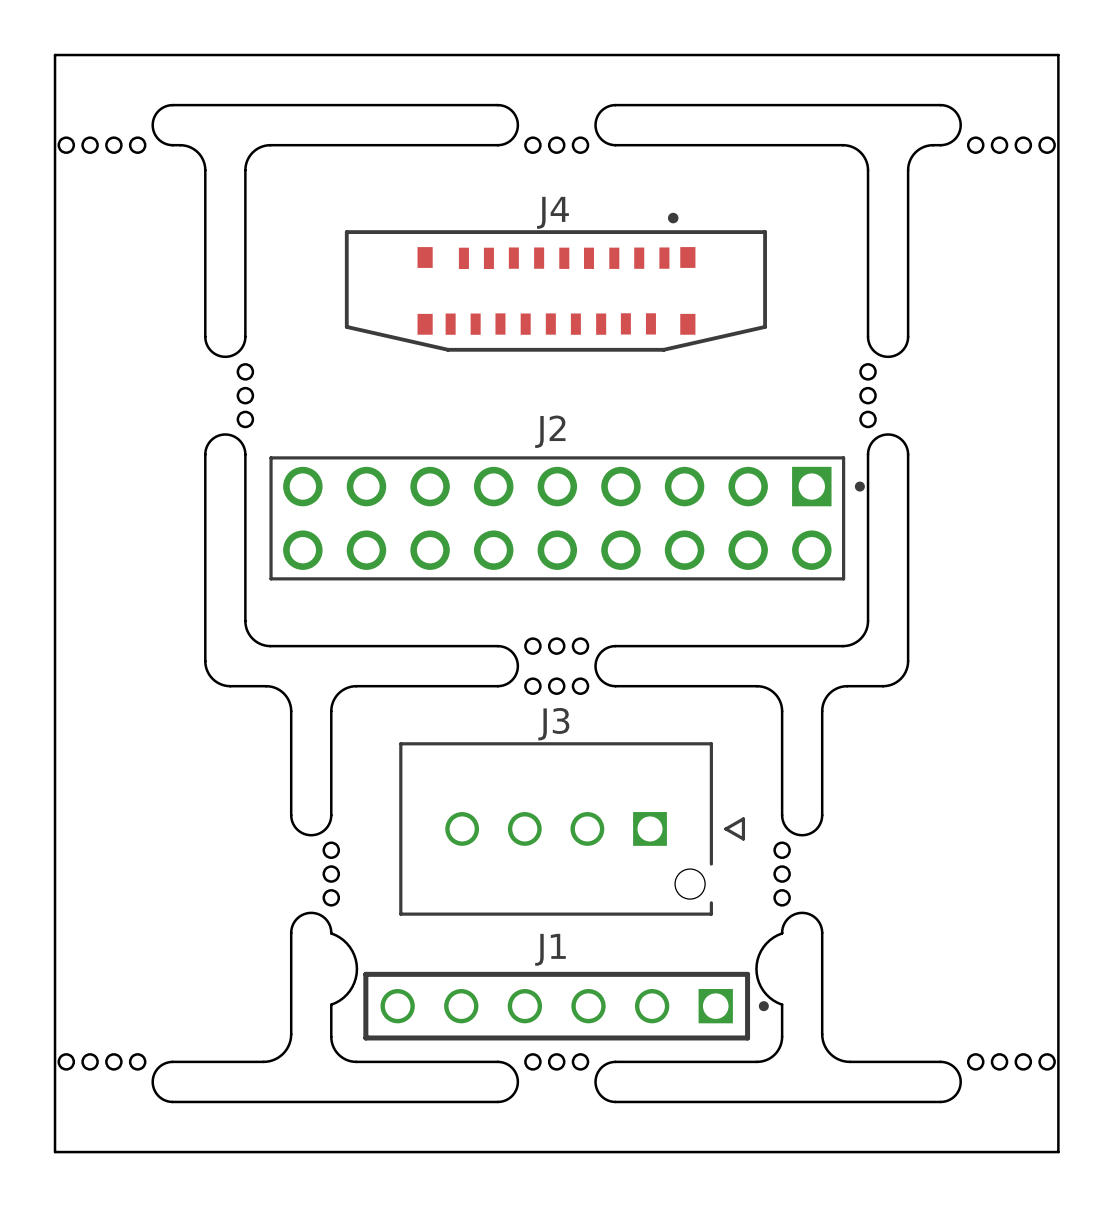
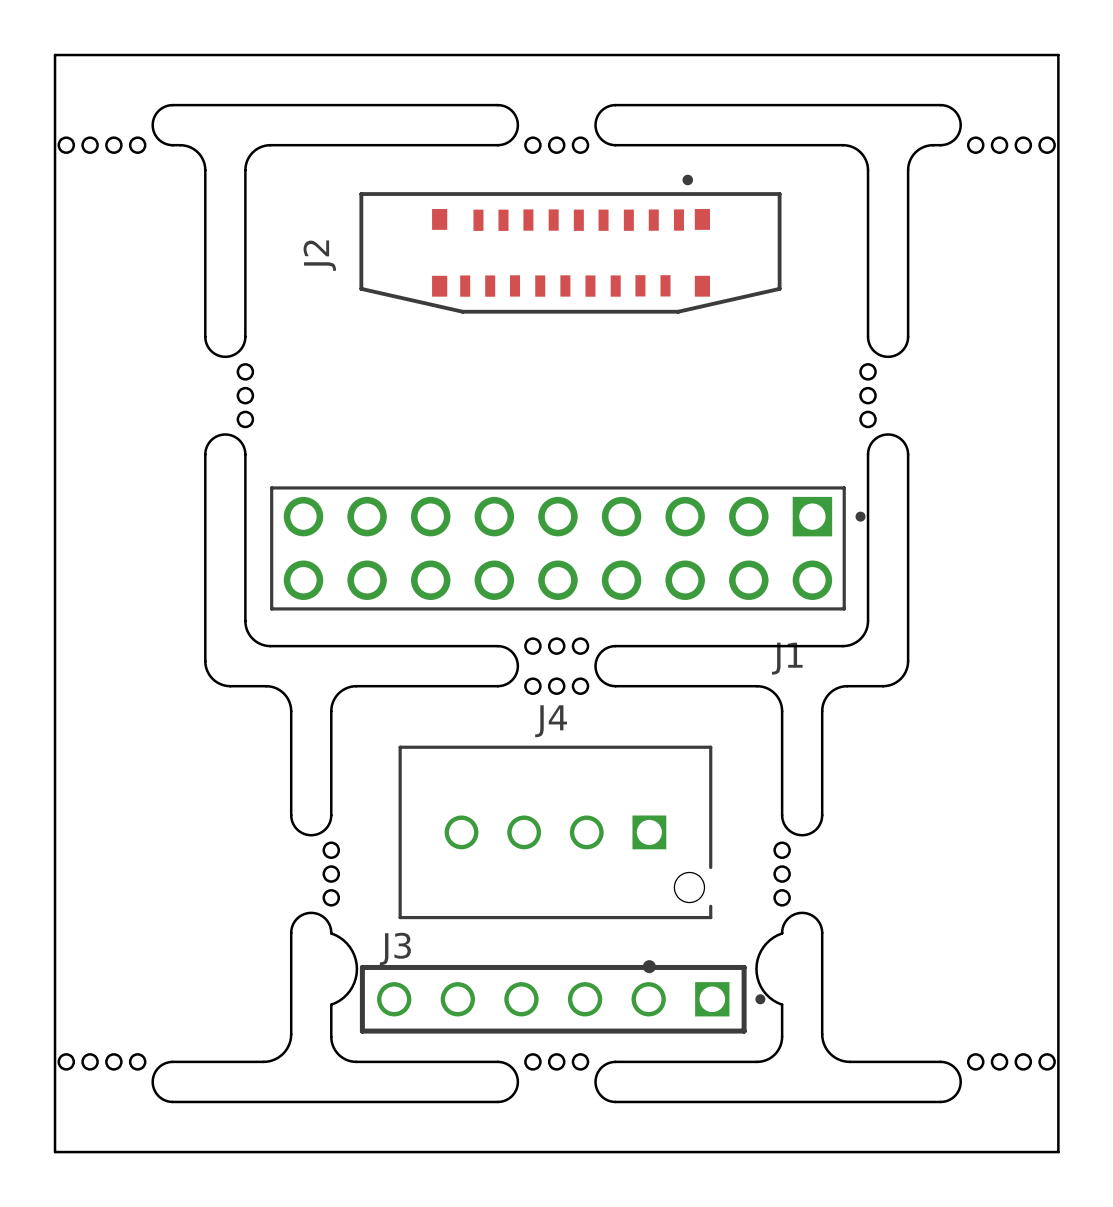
J4 footprint: [344, 212, 767, 352] -> [398, 745, 713, 974]
J4 name position: J4 (552, 212) -> J4 (551, 721)
J2 name position: J2 (550, 431) -> J2 (319, 255)
J2 footprint: [269, 456, 865, 581] -> [359, 174, 782, 314]
J3 name position: J3 (553, 724) -> J3 (395, 948)
J3 footprint: [399, 742, 746, 916] -> [359, 964, 766, 1034]
J1 name position: J1 (550, 949) -> J1 (787, 658)
J1 footprint: [363, 971, 769, 1041] -> [270, 486, 866, 611]

